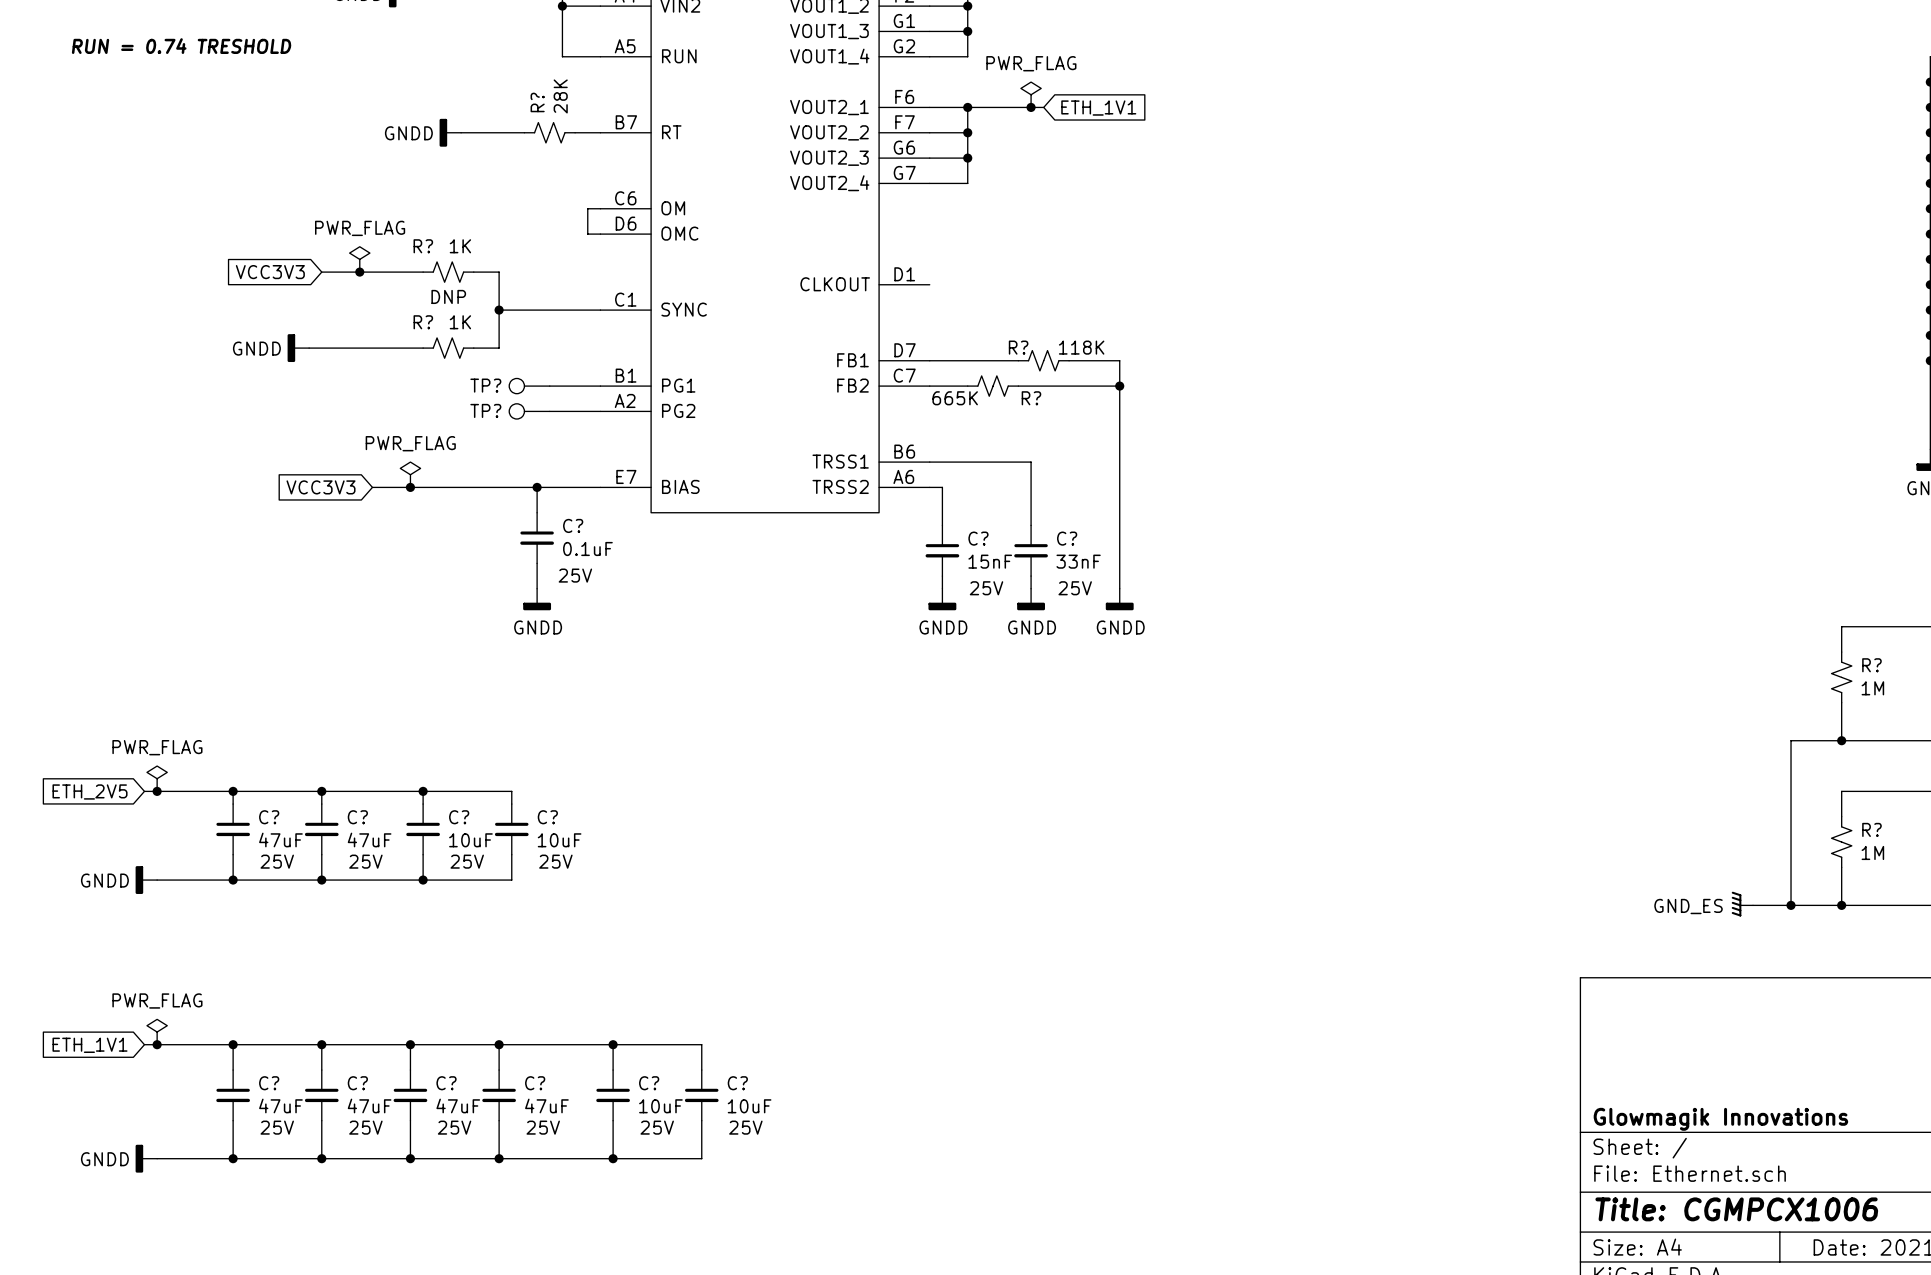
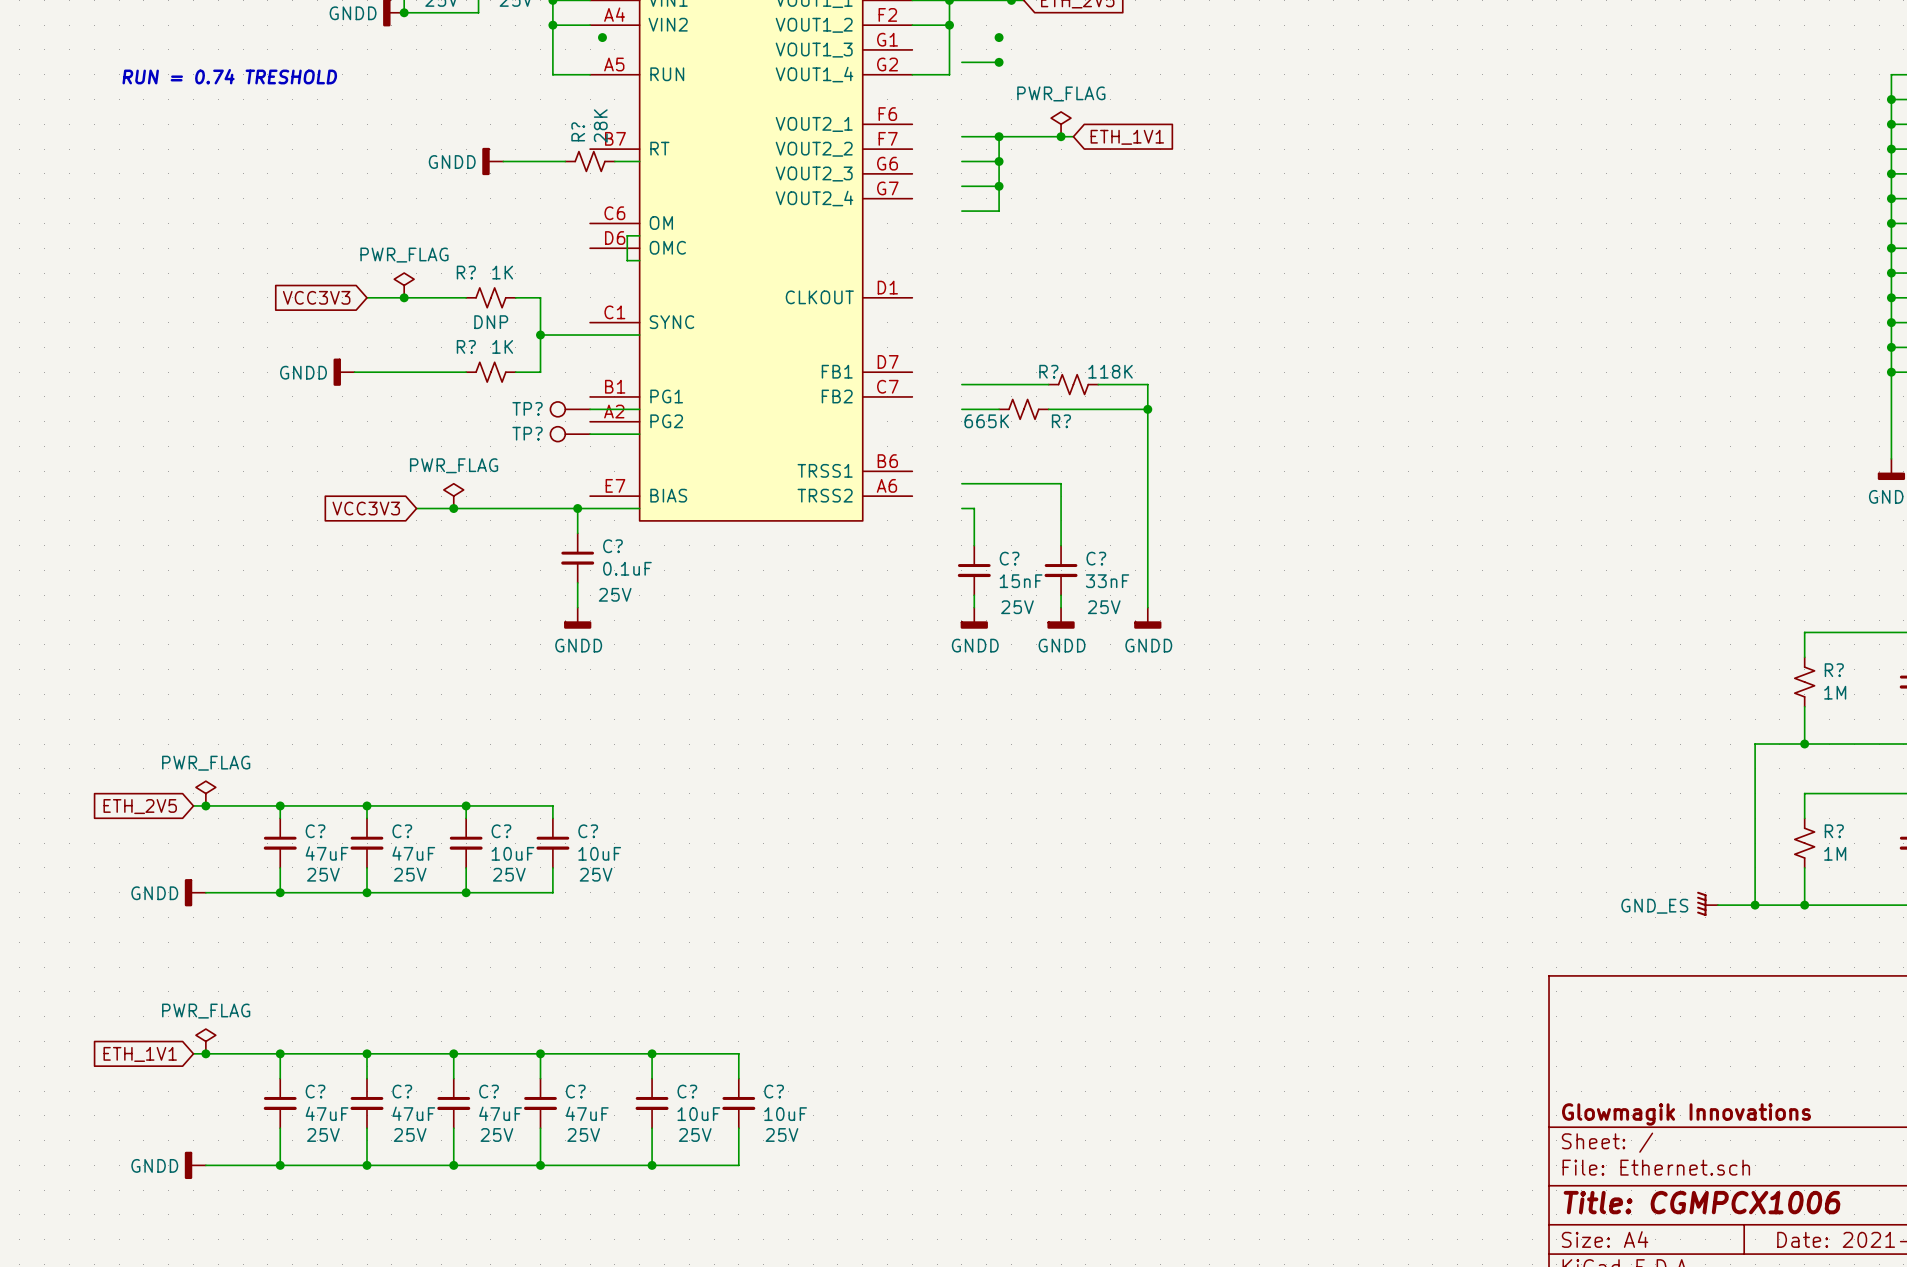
junction: none -> (602, 37)
junction: none -> (999, 37)
wire: (929, 31) (967, 31) -> (961, 62) (999, 62)
junction: (967, 31) -> none
junction: none -> (999, 62)
text position: RUN = 0.74 TRESHOLD (181, 46) -> RUN = 0.74 TRESHOLD (229, 76)
power symbol position: PWR_FLAG (1031, 94) -> PWR_FLAG (1061, 124)
wire: (929, 107) (1043, 107) -> (961, 136) (1073, 136)
wire: (967, 107) (967, 183) (929, 183) -> (999, 136) (999, 211) (961, 211)
junction: (967, 107) -> none
junction position: (1031, 107) -> (999, 136)
global label position: ETH_1V1 (1098, 108) -> ETH_1V1 (1127, 137)
junction: none -> (1061, 136)
power symbol position: GNDD (450, 132) -> GNDD (492, 161)
wire: (461, 132) (524, 132) -> (503, 161) (565, 161)
R? position: (549, 132) -> (590, 161)
wire: (575, 132) (600, 132) -> (614, 161) (639, 161)
wire: (929, 132) (967, 132) -> (961, 161) (999, 161)
junction: (967, 132) -> none
junction: none -> (999, 161)
wire: (929, 158) (967, 158) -> (961, 186) (999, 186)
junction: (967, 158) -> none
junction: none -> (999, 186)
wire: (600, 208) (587, 208) (587, 234) (600, 234) -> (639, 235) (627, 235) (627, 260) (639, 260)
power symbol position: PWR_FLAG (359, 259) -> PWR_FLAG (404, 285)
global label position: VCC3V3 (270, 272) -> VCC3V3 (316, 297)
wire: (321, 272) (423, 272) -> (367, 297) (466, 297)
junction: (359, 272) -> none
R? position: (448, 272) -> (490, 297)
wire: (473, 272) (499, 272) (499, 348) (473, 348) -> (515, 297) (540, 297) (540, 372) (515, 372)
junction: none -> (404, 297)
wire: (499, 310) (600, 310) -> (540, 335) (639, 335)
junction: (499, 310) -> none
junction: none -> (540, 335)
power symbol position: GNDD (298, 348) -> GNDD (344, 372)
wire: (309, 348) (423, 348) -> (354, 372) (466, 372)
R? position: (448, 348) -> (490, 372)
wire: (929, 360) (1018, 360) -> (961, 384) (1048, 384)
R? position: (1043, 360) -> (1073, 384)
wire: (1069, 360) (1119, 360) (1119, 588) -> (1098, 384) (1147, 384) (1147, 607)
TP?: (529, 386) -> none
wire: (549, 386) (600, 386) -> (590, 409) (639, 409)
wire: (929, 386) (967, 386) -> (961, 409) (999, 409)
R? position: (993, 386) -> (1023, 409)
wire: (1018, 386) (1119, 386) -> (1048, 409) (1147, 409)
junction position: (1119, 386) -> (1147, 409)
TP?: none -> (570, 409)
TP?: (529, 411) -> none
wire: (549, 411) (600, 411) -> (590, 434) (639, 434)
TP?: none -> (570, 434)
wire: (929, 462) (1031, 462) (1031, 525) -> (961, 483) (1061, 483) (1061, 545)
power symbol position: PWR_FLAG (410, 474) -> PWR_FLAG (453, 496)
global label position: VCC3V3 (321, 487) -> VCC3V3 (366, 508)
wire: (372, 487) (600, 487) -> (416, 508) (639, 508)
junction: (410, 487) -> none
wire: (537, 487) (537, 512) -> (577, 508) (577, 533)
junction: (537, 487) -> none
wire: (929, 487) (942, 487) (942, 525) -> (961, 508) (974, 508) (974, 545)
junction: none -> (453, 508)
junction: none -> (577, 508)
C? position: (537, 538) -> (577, 558)
C? position: (942, 550) -> (974, 570)
C? position: (1031, 550) -> (1061, 570)
wire: (537, 563) (537, 588) -> (577, 582) (577, 607)
wire: (942, 576) (942, 588) -> (974, 595) (974, 607)
wire: (1031, 576) (1031, 588) -> (1061, 595) (1061, 607)
power symbol position: GNDD (537, 599) -> GNDD (577, 618)
power symbol: GNDD (942, 599) -> none
power symbol: GNDD (1031, 599) -> none
power symbol: GNDD (1119, 599) -> none
power symbol: none -> GNDD (974, 618)
power symbol: none -> GNDD (1061, 618)
power symbol: none -> GNDD (1147, 618)
power symbol position: PWR_FLAG (157, 778) -> PWR_FLAG (205, 793)
global label position: ETH_2V5 (90, 791) -> ETH_2V5 (140, 806)
wire: (144, 791) (511, 791) (511, 804) -> (193, 805) (552, 805) (552, 818)
junction: (157, 791) -> none
wire: (233, 791) (233, 804) -> (280, 805) (280, 818)
junction: (233, 791) -> none
wire: (321, 791) (321, 804) -> (367, 805) (367, 818)
junction: (321, 791) -> none
wire: (423, 791) (423, 804) -> (466, 805) (466, 818)
junction: (423, 791) -> none
junction: none -> (205, 805)
junction: none -> (280, 805)
junction: none -> (367, 805)
junction: none -> (466, 805)
C?: 47uF (233, 829) -> none
C?: 47uF (321, 829) -> none
C?: 10uF (423, 829) -> none
C?: 10uF (511, 829) -> none
C?: none -> 47uF (280, 843)
C?: none -> 47uF (367, 843)
C?: none -> 10uF (466, 843)
C?: none -> 10uF (552, 843)
wire: (233, 854) (233, 880) -> (280, 867) (280, 892)
wire: (321, 854) (321, 880) -> (367, 867) (367, 892)
wire: (423, 854) (423, 880) -> (466, 867) (466, 892)
wire: (511, 854) (511, 880) (157, 880) -> (552, 867) (552, 892) (205, 892)
power symbol position: GNDD (146, 880) -> GNDD (195, 892)
junction: (233, 880) -> none
junction: (321, 880) -> none
junction: (423, 880) -> none
junction: none -> (280, 892)
junction: none -> (367, 892)
junction: none -> (466, 892)
power symbol position: PWR_FLAG (157, 1032) -> PWR_FLAG (205, 1041)
wire: (144, 1044) (701, 1044) (701, 1070) -> (193, 1053) (738, 1053) (738, 1078)
junction: (157, 1044) -> none
wire: (233, 1044) (233, 1070) -> (280, 1053) (280, 1078)
junction: (233, 1044) -> none
wire: (321, 1044) (321, 1070) -> (367, 1053) (367, 1078)
junction: (321, 1044) -> none
wire: (410, 1044) (410, 1070) -> (453, 1053) (453, 1078)
junction: (410, 1044) -> none
wire: (499, 1044) (499, 1070) -> (540, 1053) (540, 1078)
junction: (499, 1044) -> none
wire: (613, 1044) (613, 1070) -> (652, 1053) (652, 1078)
junction: (613, 1044) -> none
global label position: ETH_1V1 (90, 1045) -> ETH_1V1 (140, 1054)
junction: none -> (205, 1053)
junction: none -> (280, 1053)
junction: none -> (367, 1053)
junction: none -> (453, 1053)
junction: none -> (540, 1053)
junction: none -> (652, 1053)
C?: 47uF (233, 1095) -> none
C?: 47uF (321, 1095) -> none
C?: 47uF (410, 1095) -> none
C?: 47uF (499, 1095) -> none
C?: 10uF (613, 1095) -> none
C?: 10uF (701, 1095) -> none
C?: none -> 47uF (280, 1103)
C?: none -> 47uF (367, 1103)
C?: none -> 47uF (453, 1103)
C?: none -> 47uF (540, 1103)
C?: none -> 10uF (652, 1103)
C?: none -> 10uF (738, 1103)
wire: (233, 1120) (233, 1158) -> (280, 1128) (280, 1165)
wire: (321, 1120) (321, 1158) -> (367, 1128) (367, 1165)
wire: (410, 1120) (410, 1158) -> (453, 1128) (453, 1165)
wire: (499, 1120) (499, 1158) -> (540, 1128) (540, 1165)
wire: (613, 1120) (613, 1158) -> (652, 1128) (652, 1165)
wire: (701, 1120) (701, 1158) (157, 1158) -> (738, 1128) (738, 1165) (205, 1165)
power symbol position: GNDD (146, 1158) -> GNDD (195, 1165)
junction: (233, 1158) -> none
junction: (321, 1158) -> none
junction: (410, 1158) -> none
junction: (499, 1158) -> none
junction: (613, 1158) -> none
junction: none -> (280, 1165)
junction: none -> (367, 1165)
junction: none -> (453, 1165)
junction: none -> (540, 1165)
junction: none -> (652, 1165)

